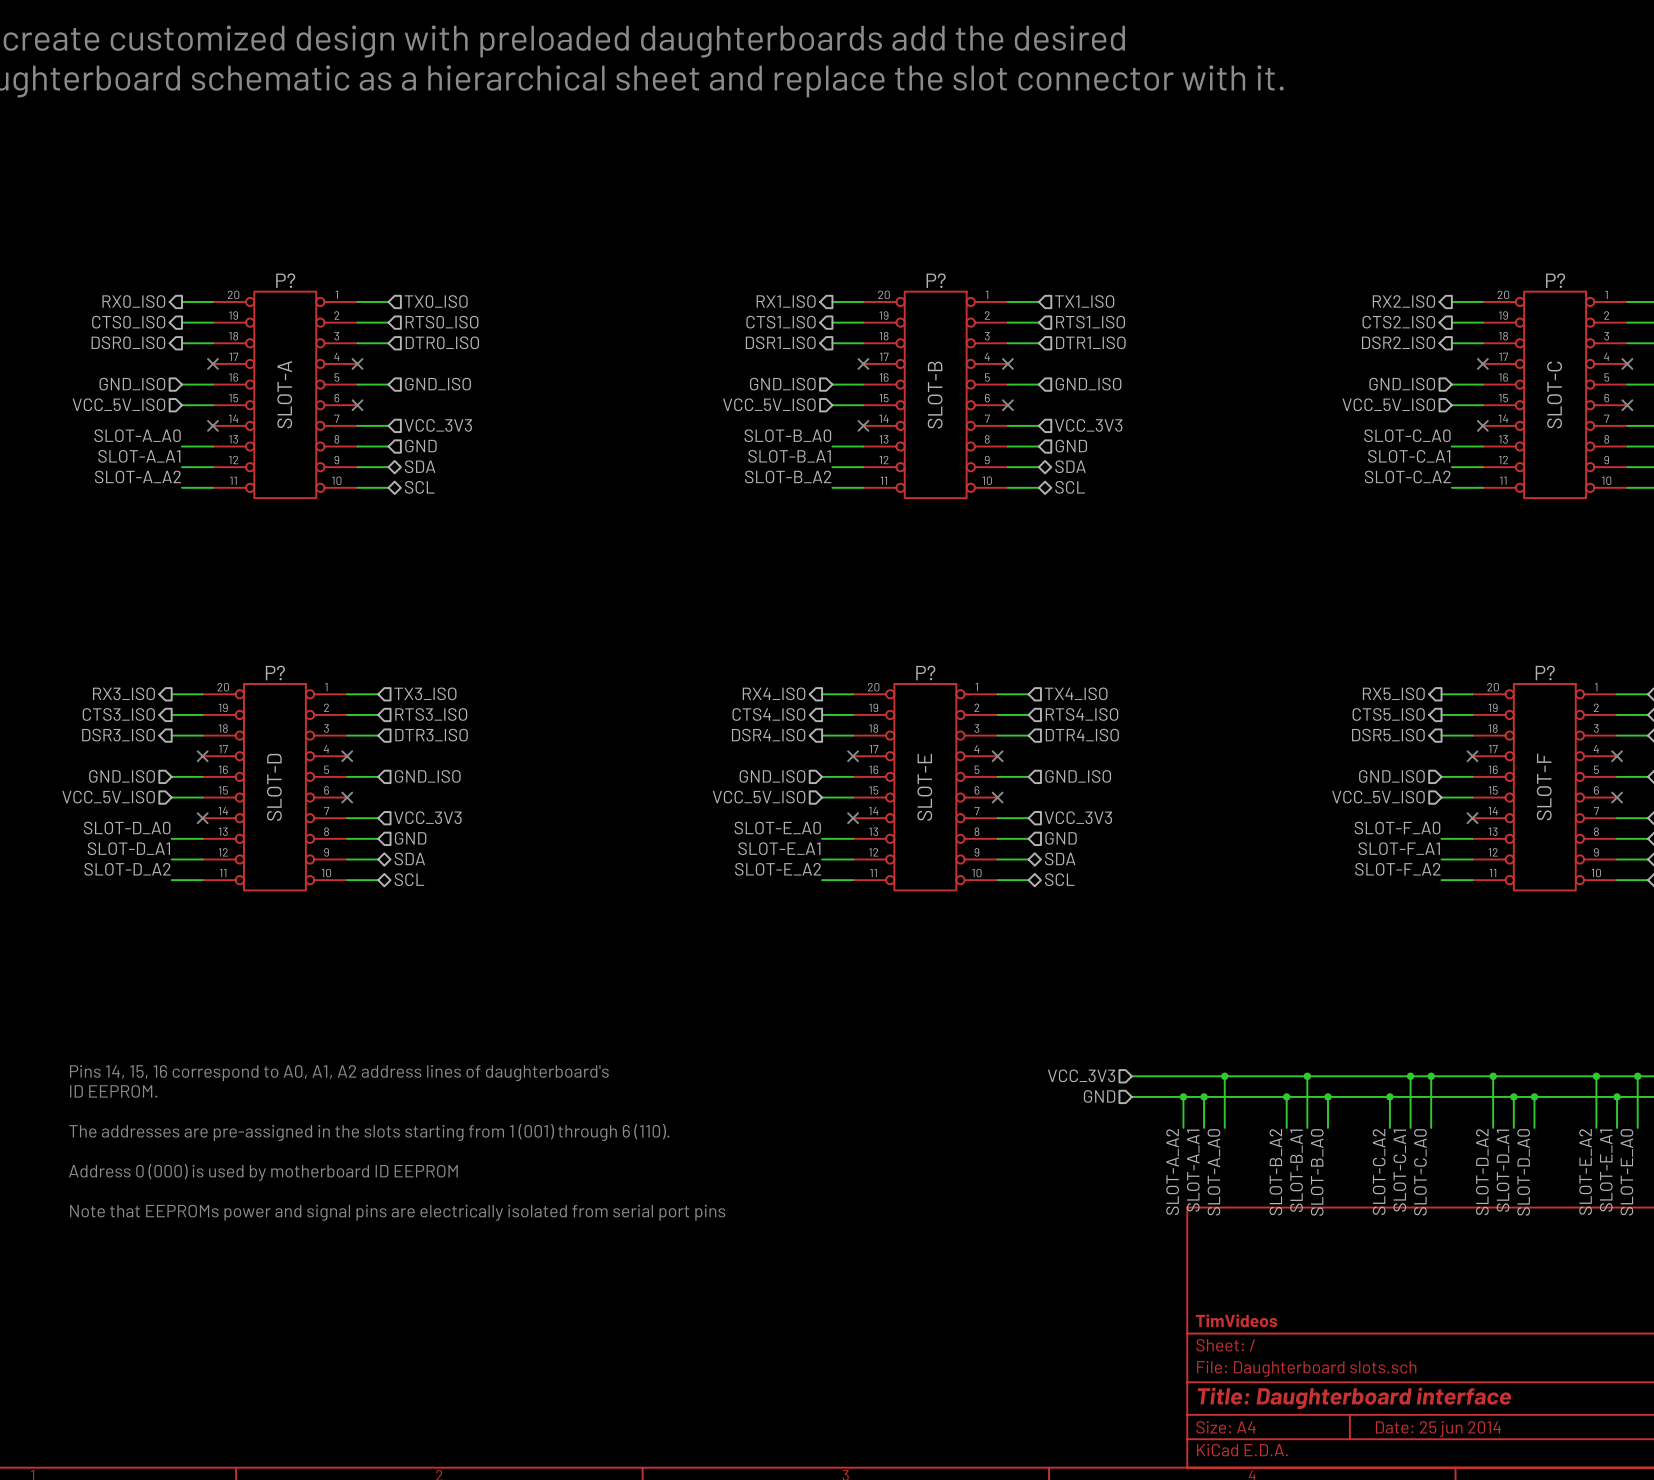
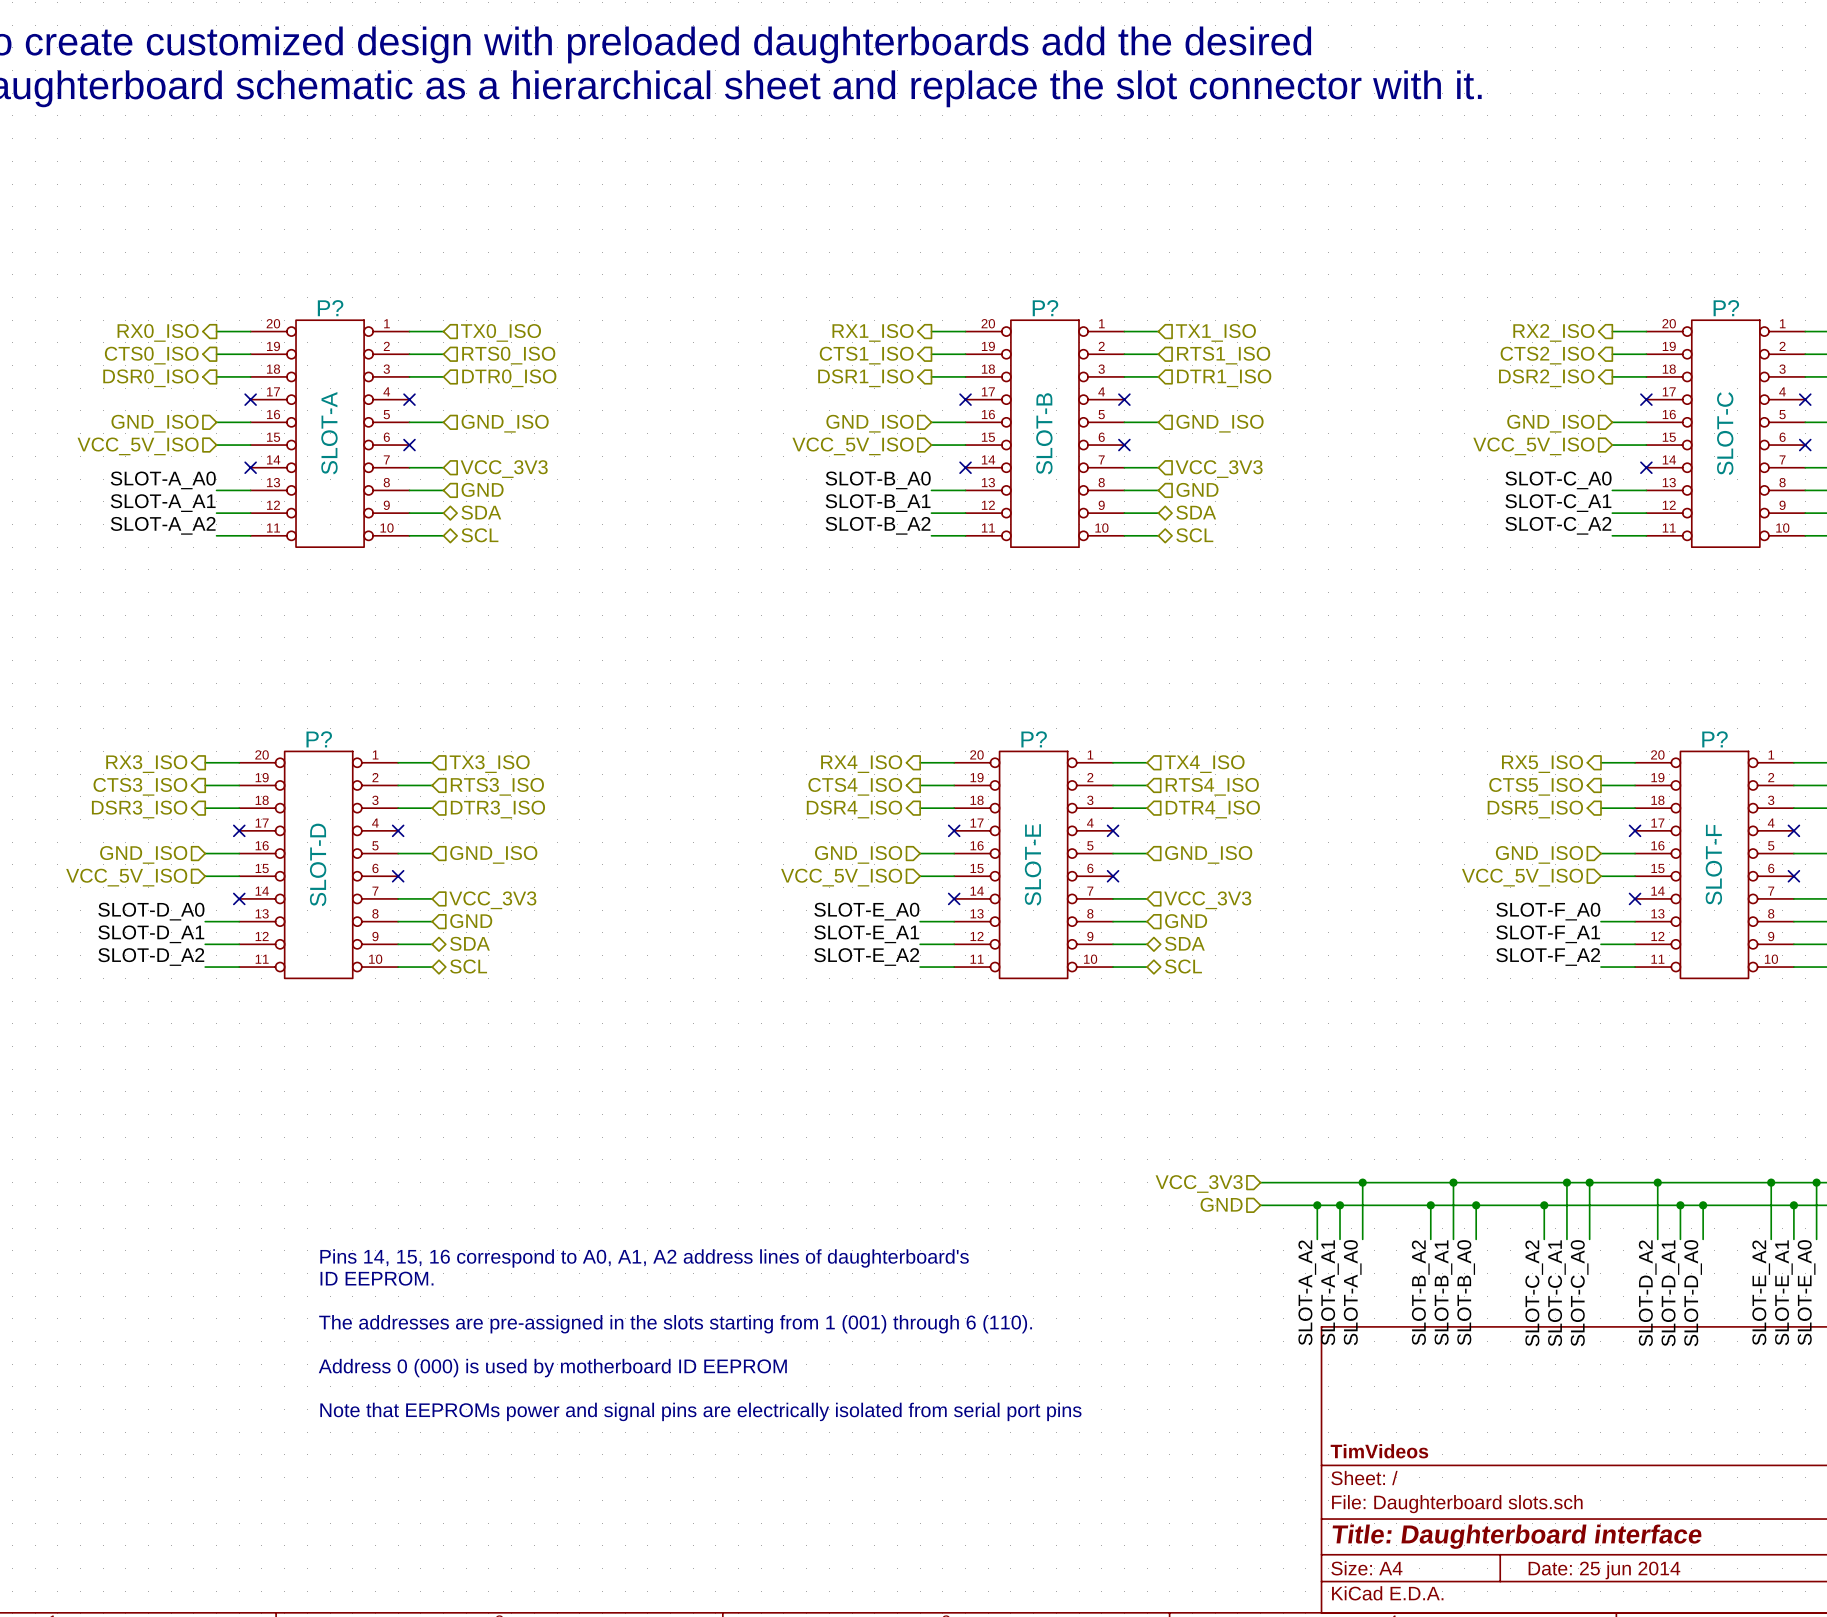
text: Pins 14, 15, 16 correspond to A0, A1, A2 address lines of daughterboard's (339, 1073) -> none
text: ID EEPROM. (113, 1091) -> none
text: The addresses are pre-assigned in the slots starting from 1 (001) through 6 (110). (369, 1132) -> none
text: none -> Pins 14, 15, 16 correspond to A0, A1, A2 address lines of daughterboard's (644, 1258)
text: none -> ID EEPROM. (377, 1278)
text: Address 0 (000) is used by motherboard ID EEPROM (263, 1172) -> none
text: none -> The addresses are pre-assigned in the slots starting from 1 (001) through 6 (110). (675, 1324)
text: Note that EEPROMs power and signal pins are electrically isolated from serial port pins (397, 1212) -> none
text: none -> Address 0 (000) is used by motherboard ID EEPROM (552, 1368)
text: none -> Note that EEPROMs power and signal pins are electrically isolated from serial port pins (700, 1411)

